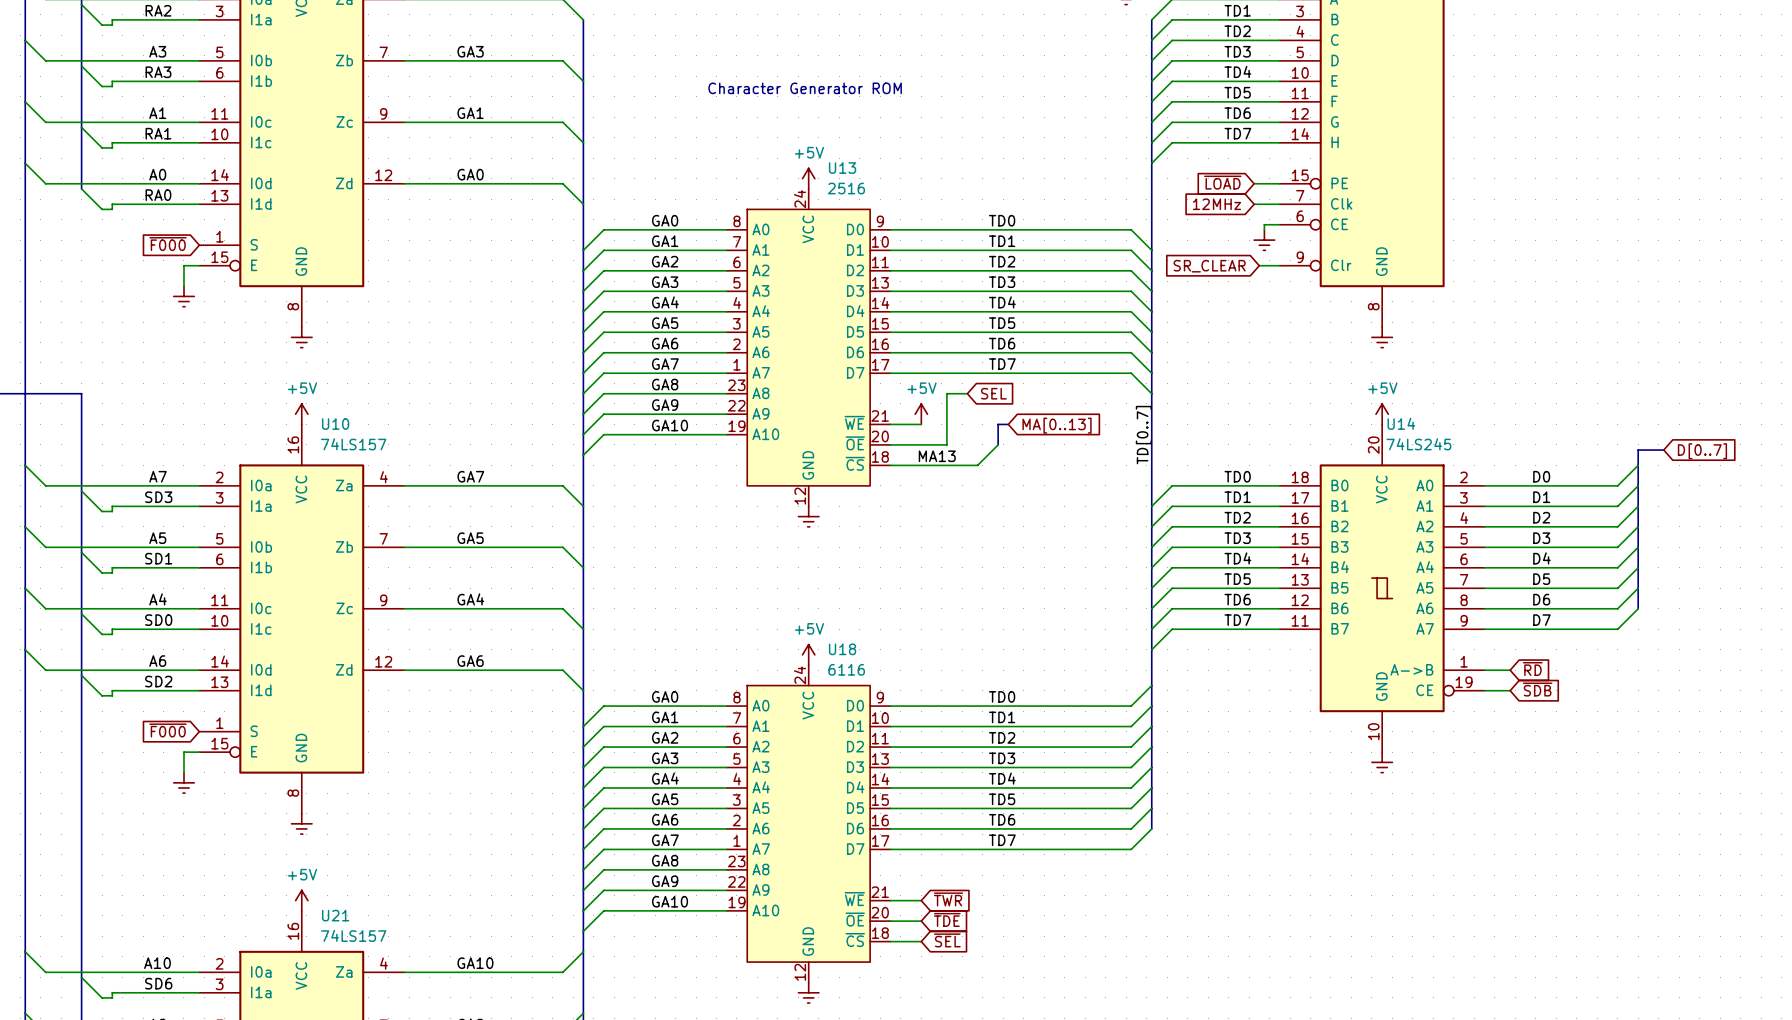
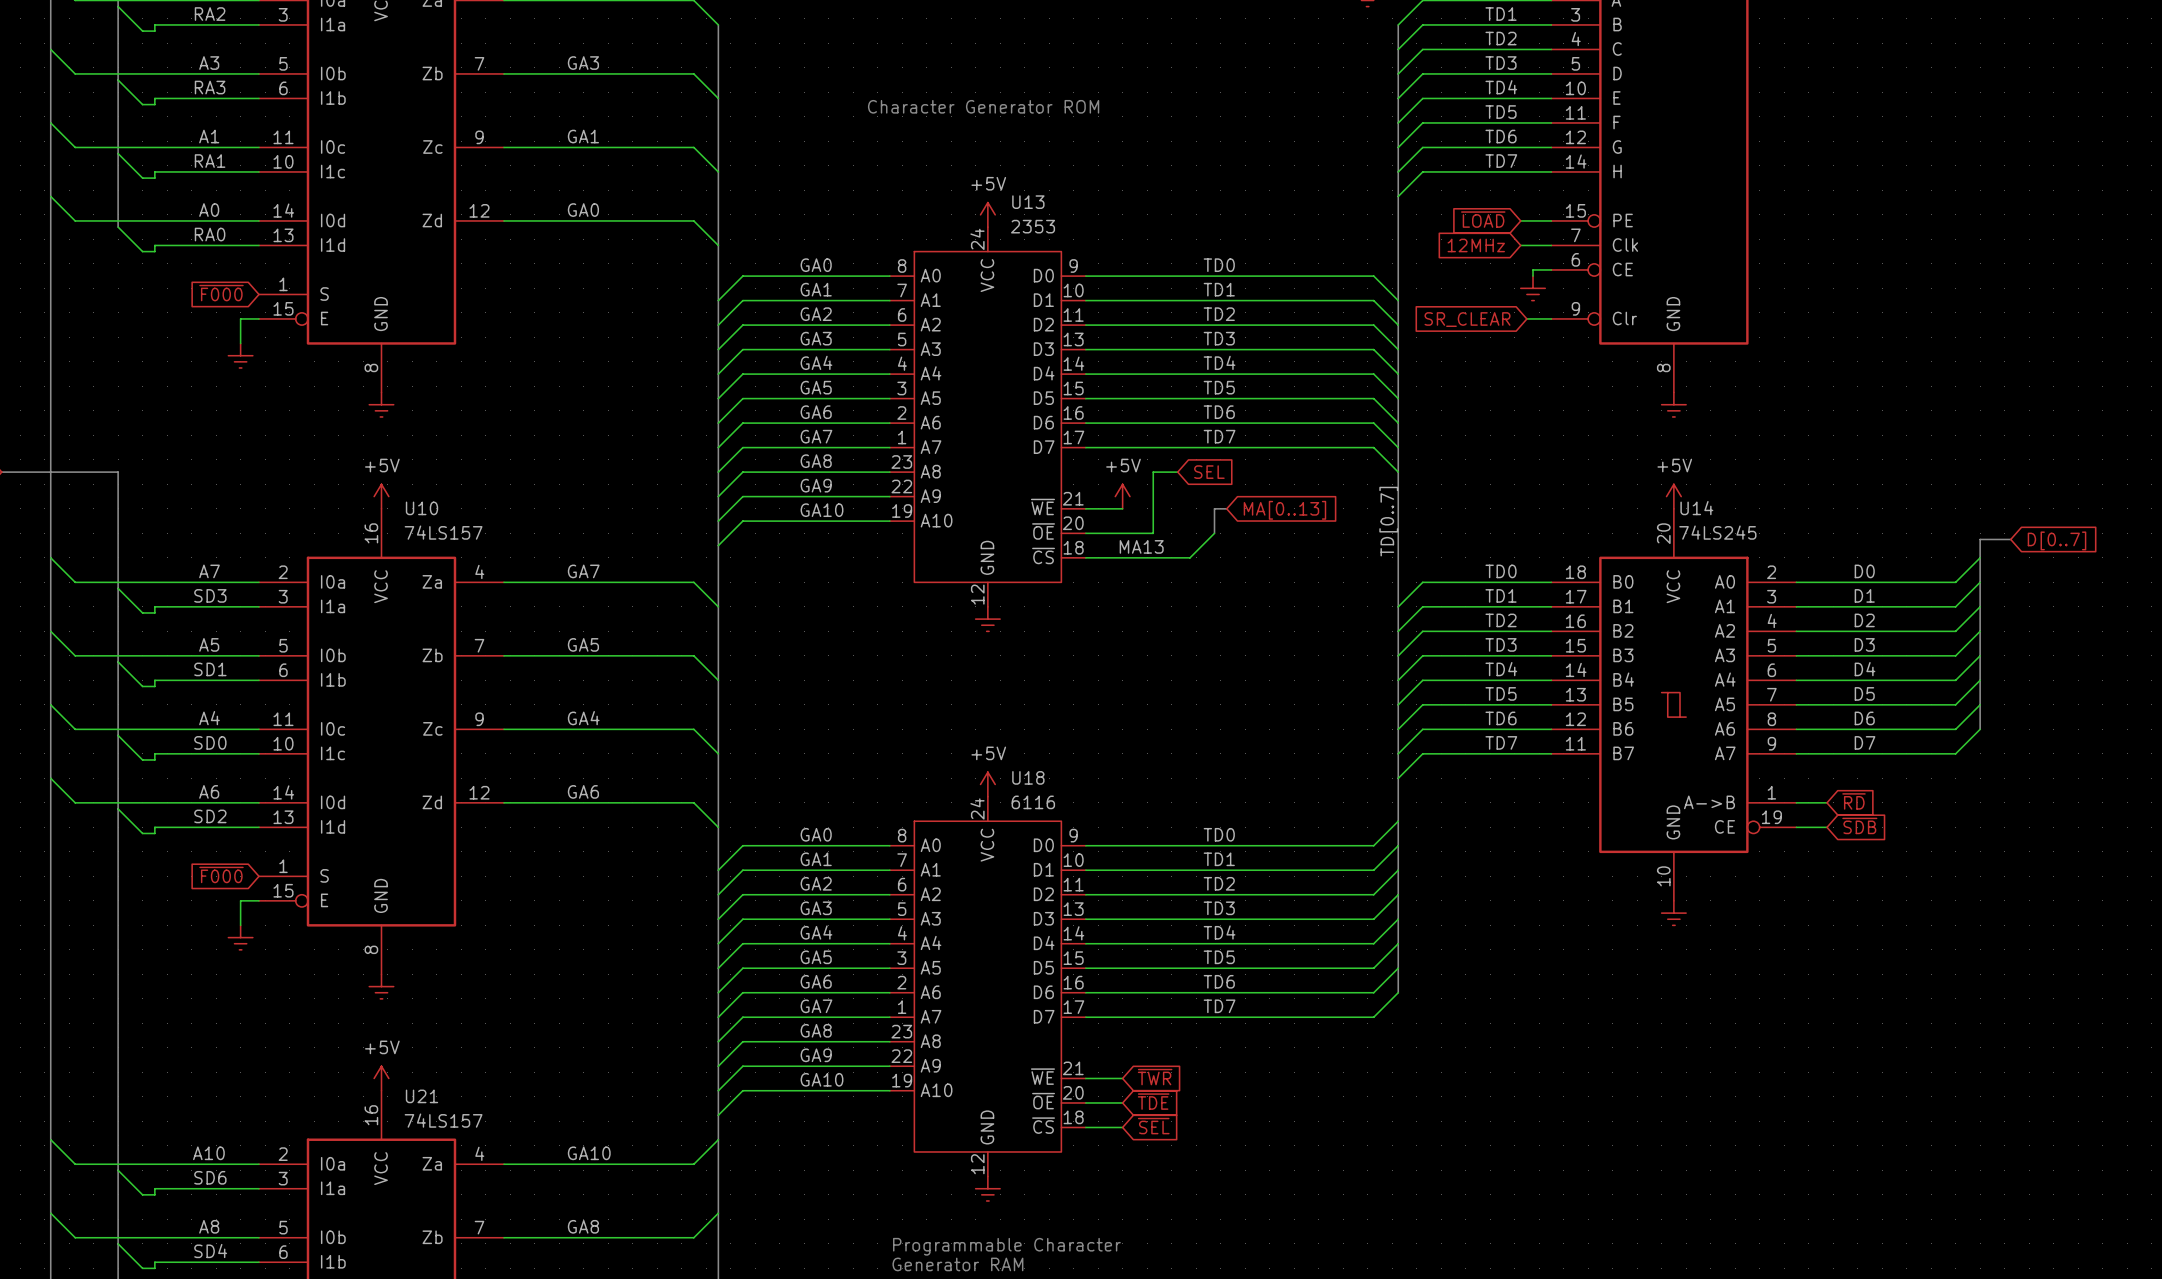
U13 value: 2516 (846, 188) -> 2353 (1033, 226)

